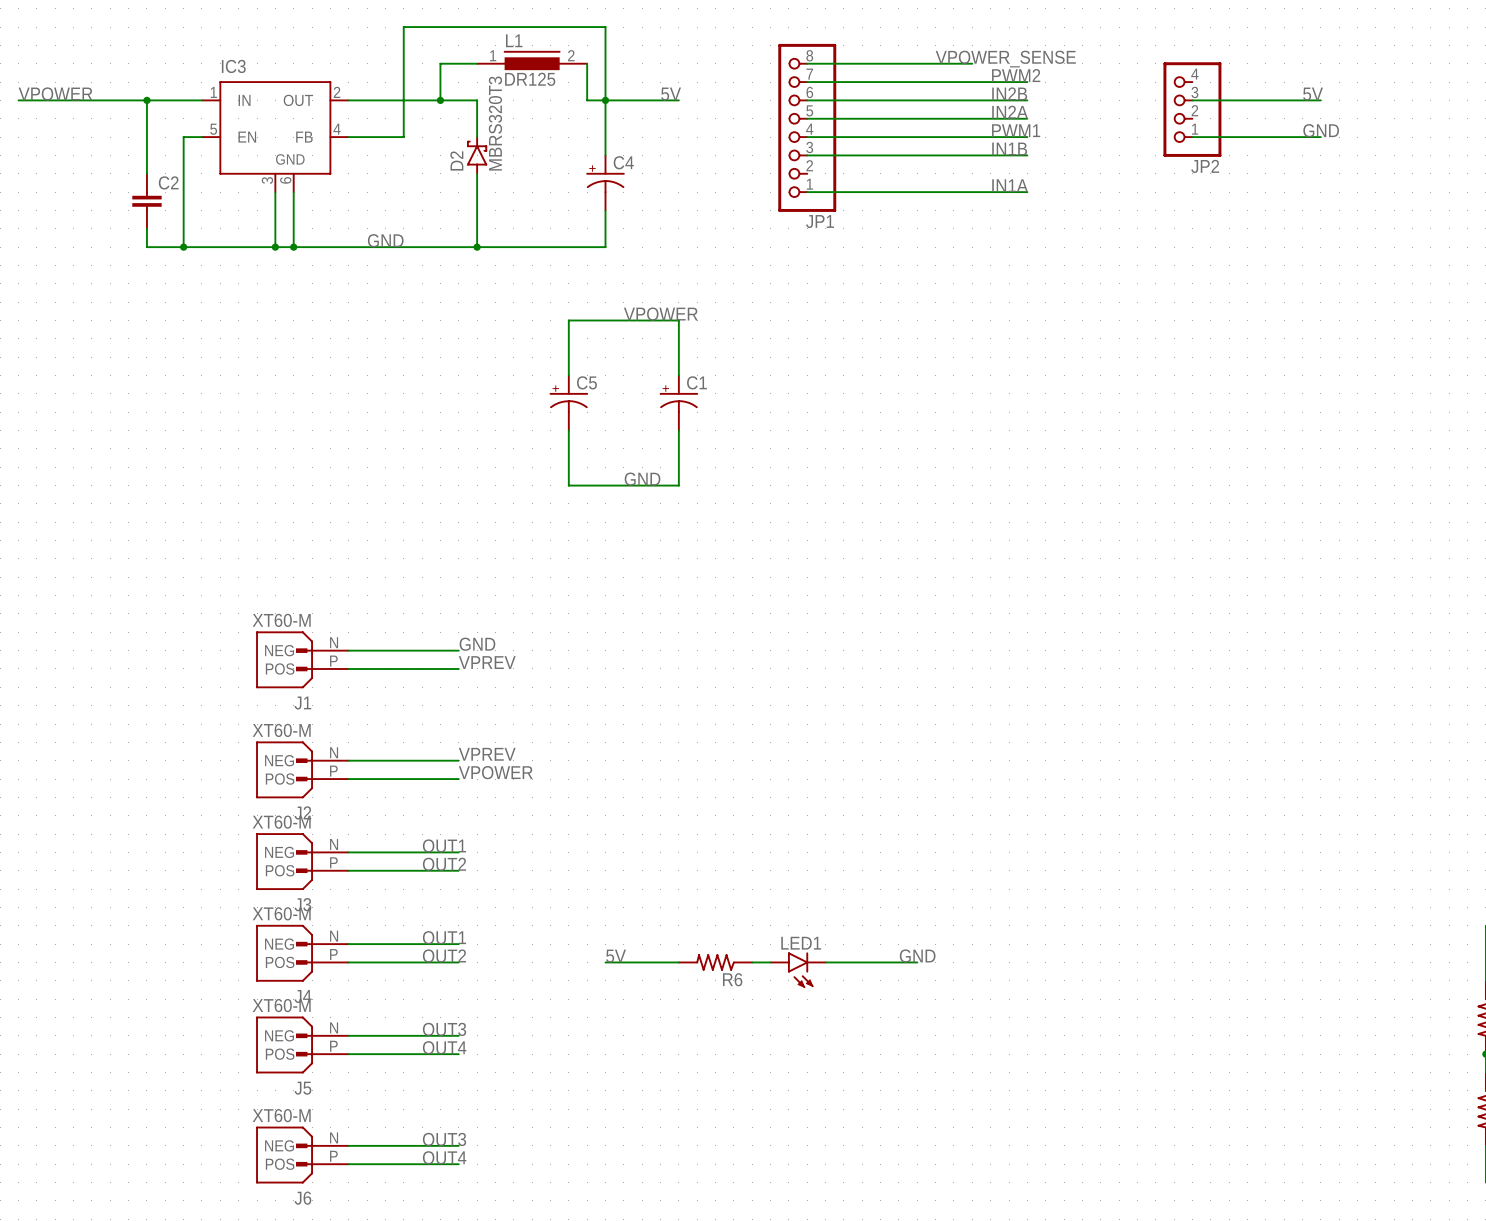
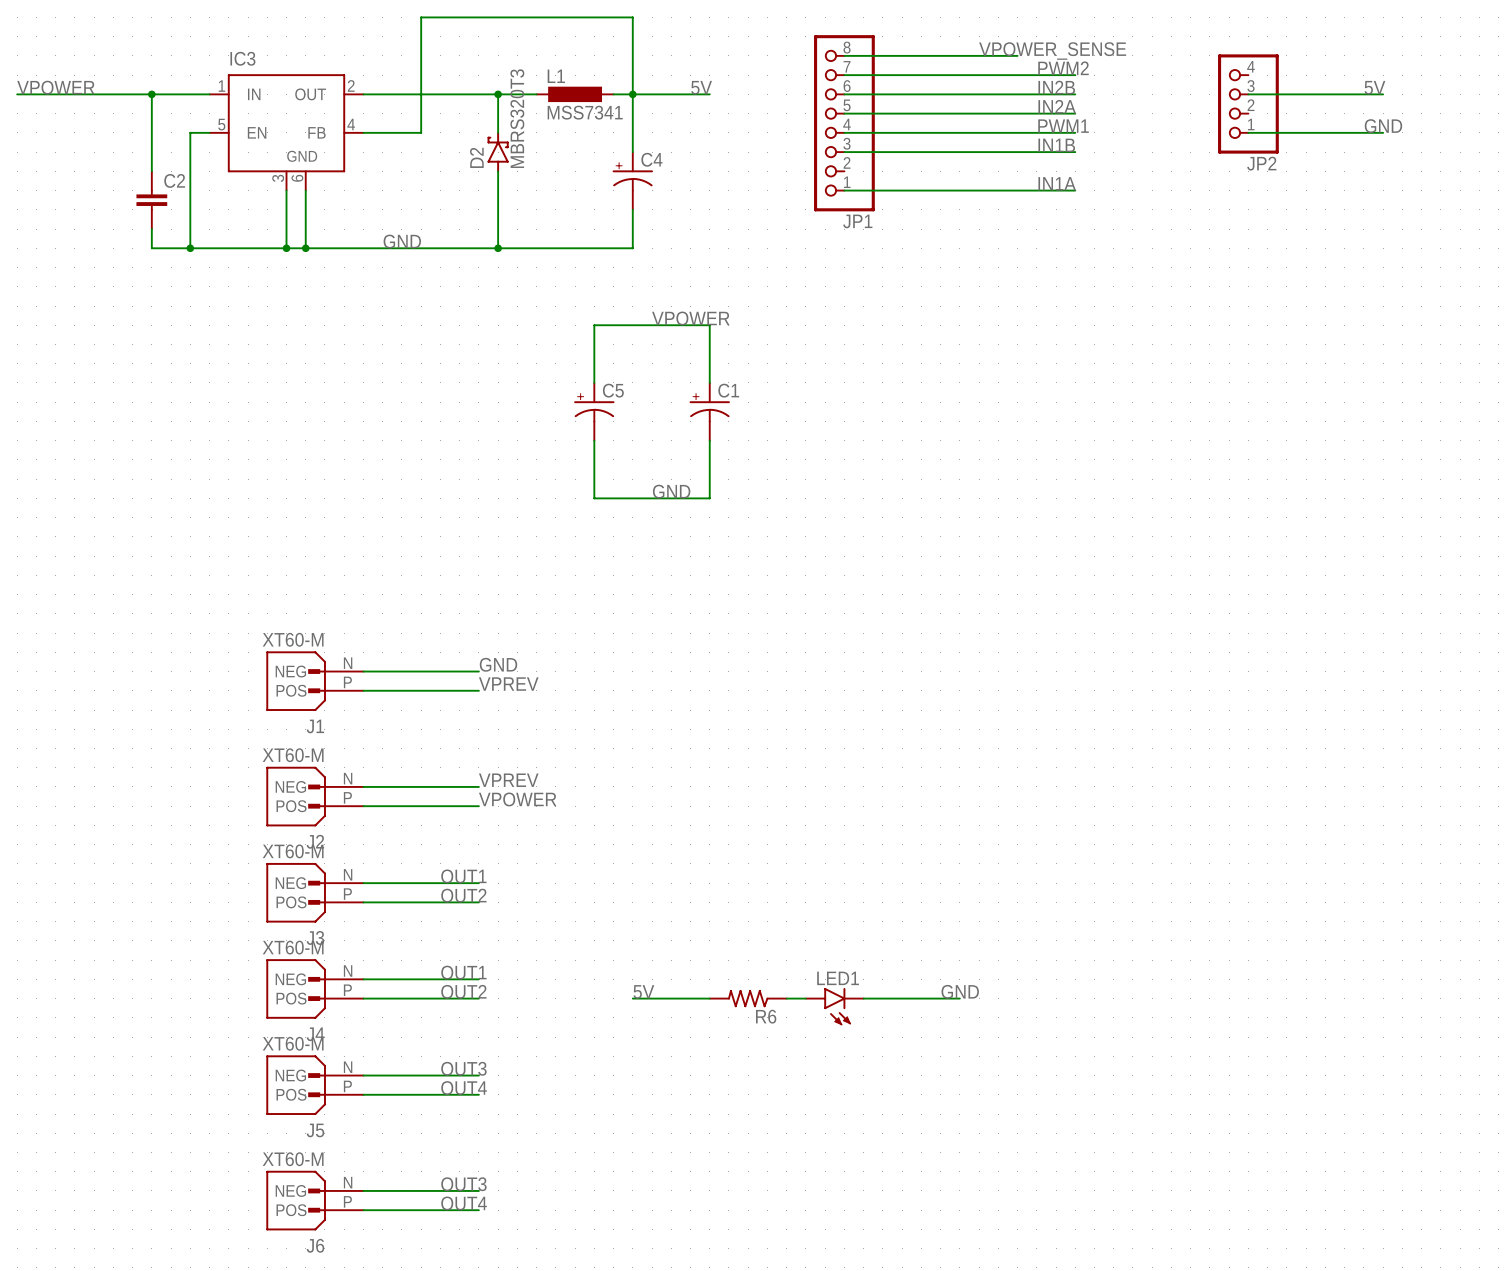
L1 symbol: [477, 50, 588, 71] -> [536, 86, 614, 103]
wire: (477, 63) (440, 63) (440, 100) -> none
wire: (587, 63) (587, 100) -> none
L1 value: DR125 (530, 79) -> MSS7341 (585, 112)
junction position: (440, 100) -> (498, 94)
wire: none -> (498, 94) (536, 94)

